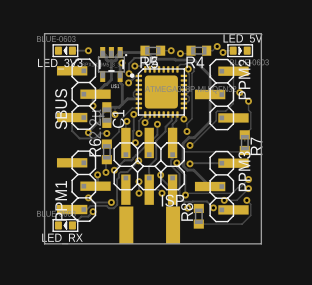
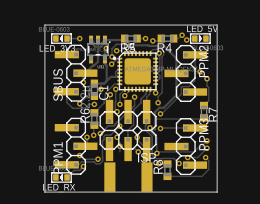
track: (183, 161) (183, 166) (187, 170) (193, 170) (208, 184) -> none
via: none -> (117, 137)
via: (139, 181) -> none
via: none -> (119, 146)
via: (139, 193) -> none

